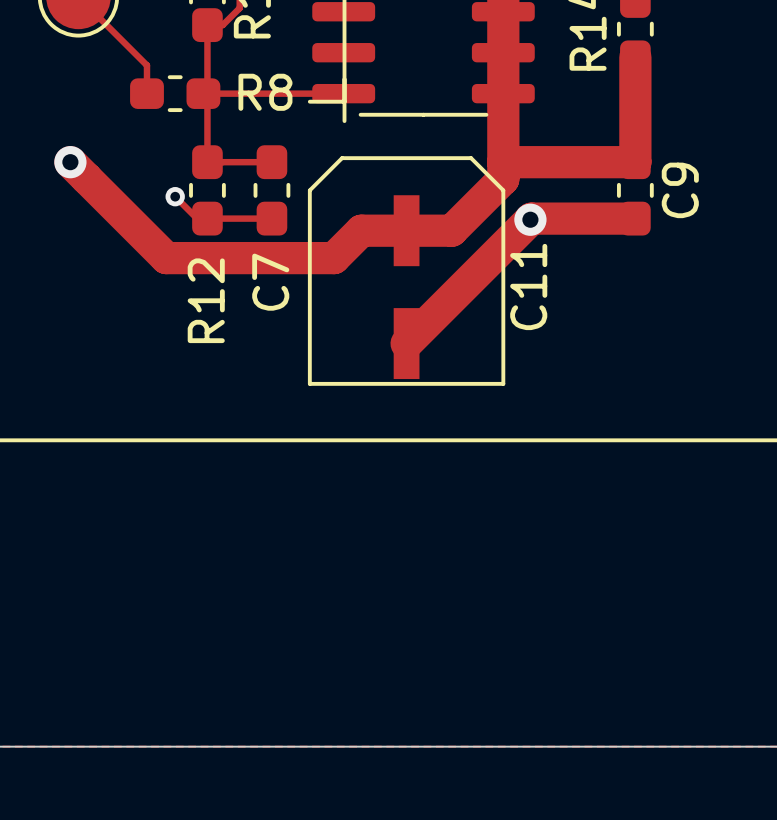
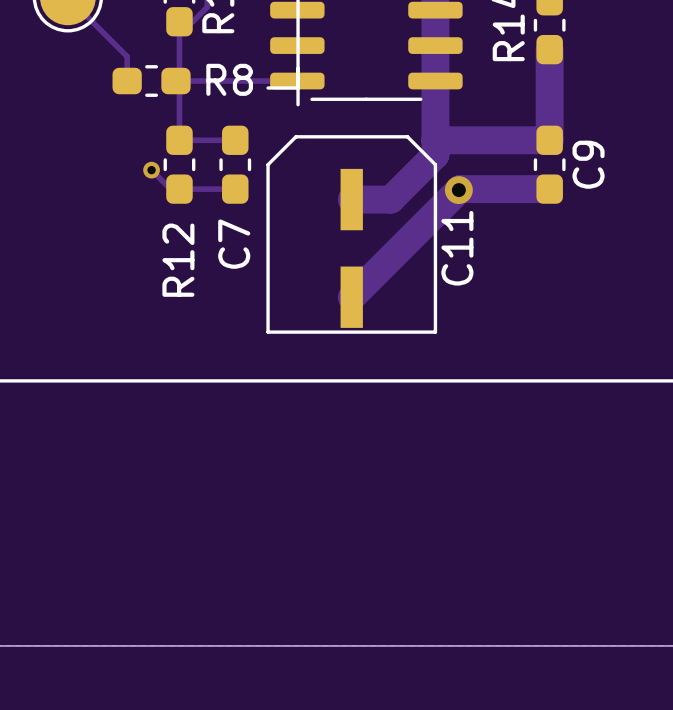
track: (70, 162) (166, 258) (334, 258) (361, 230) (406, 230) -> none
via: (70, 162) -> none

